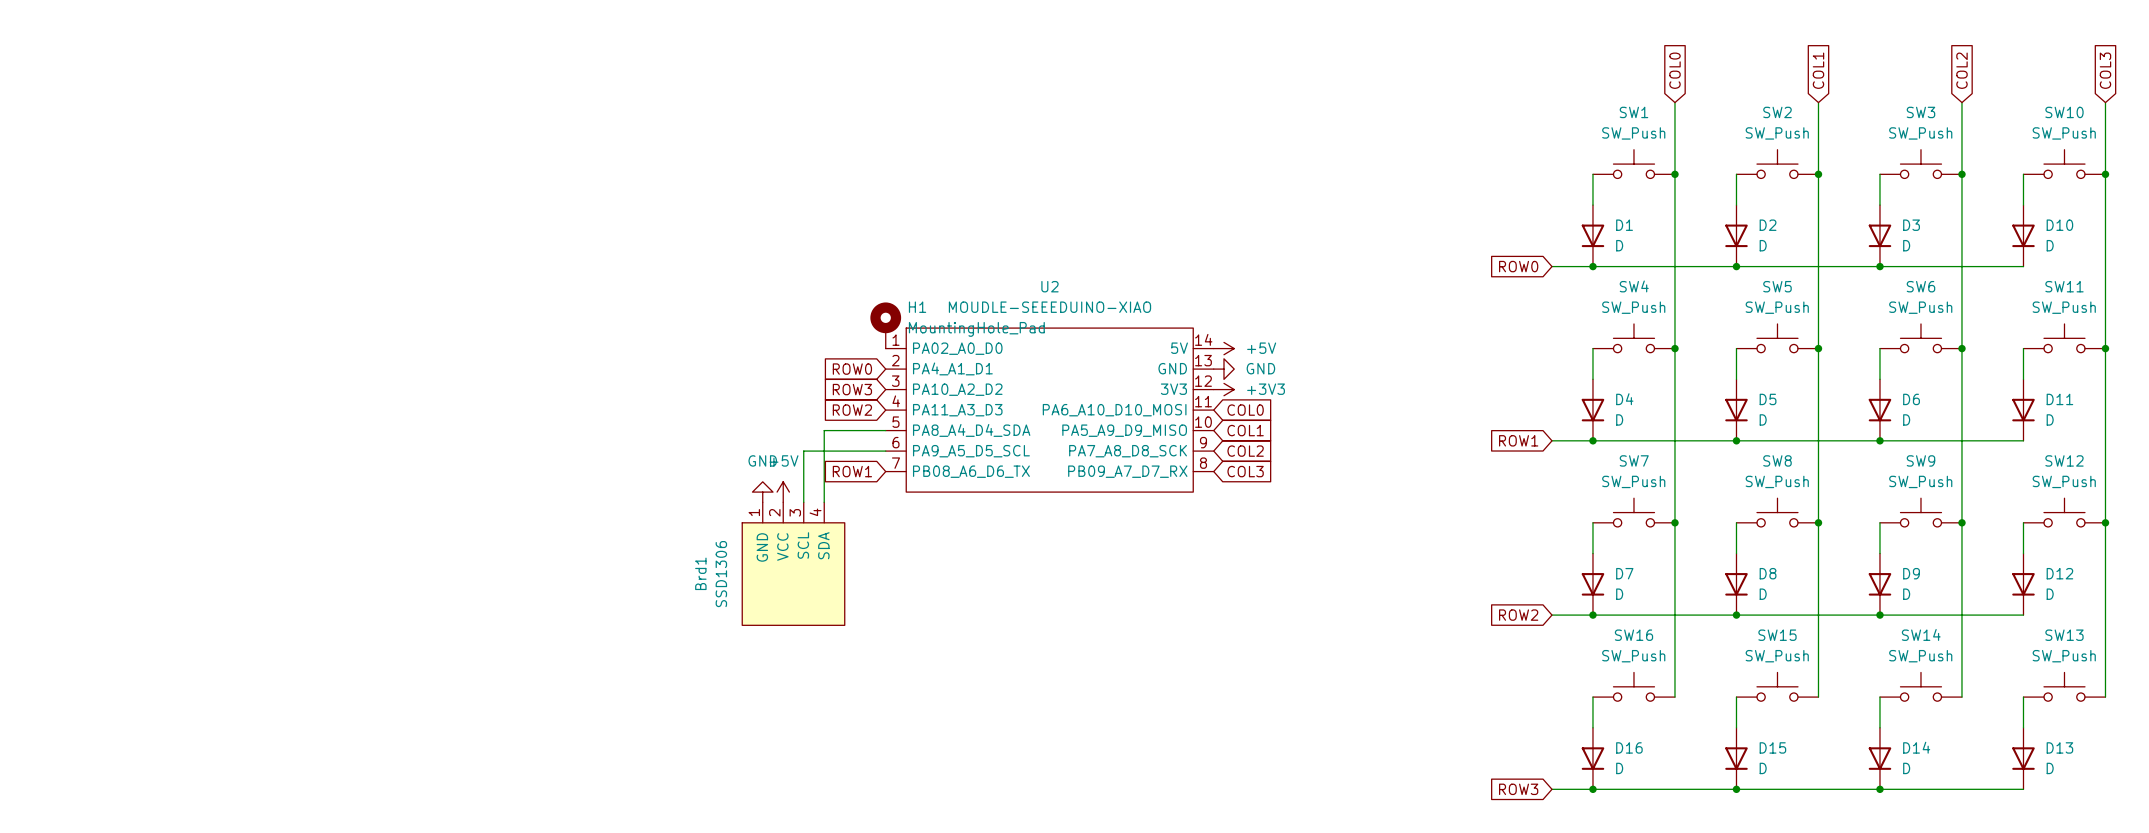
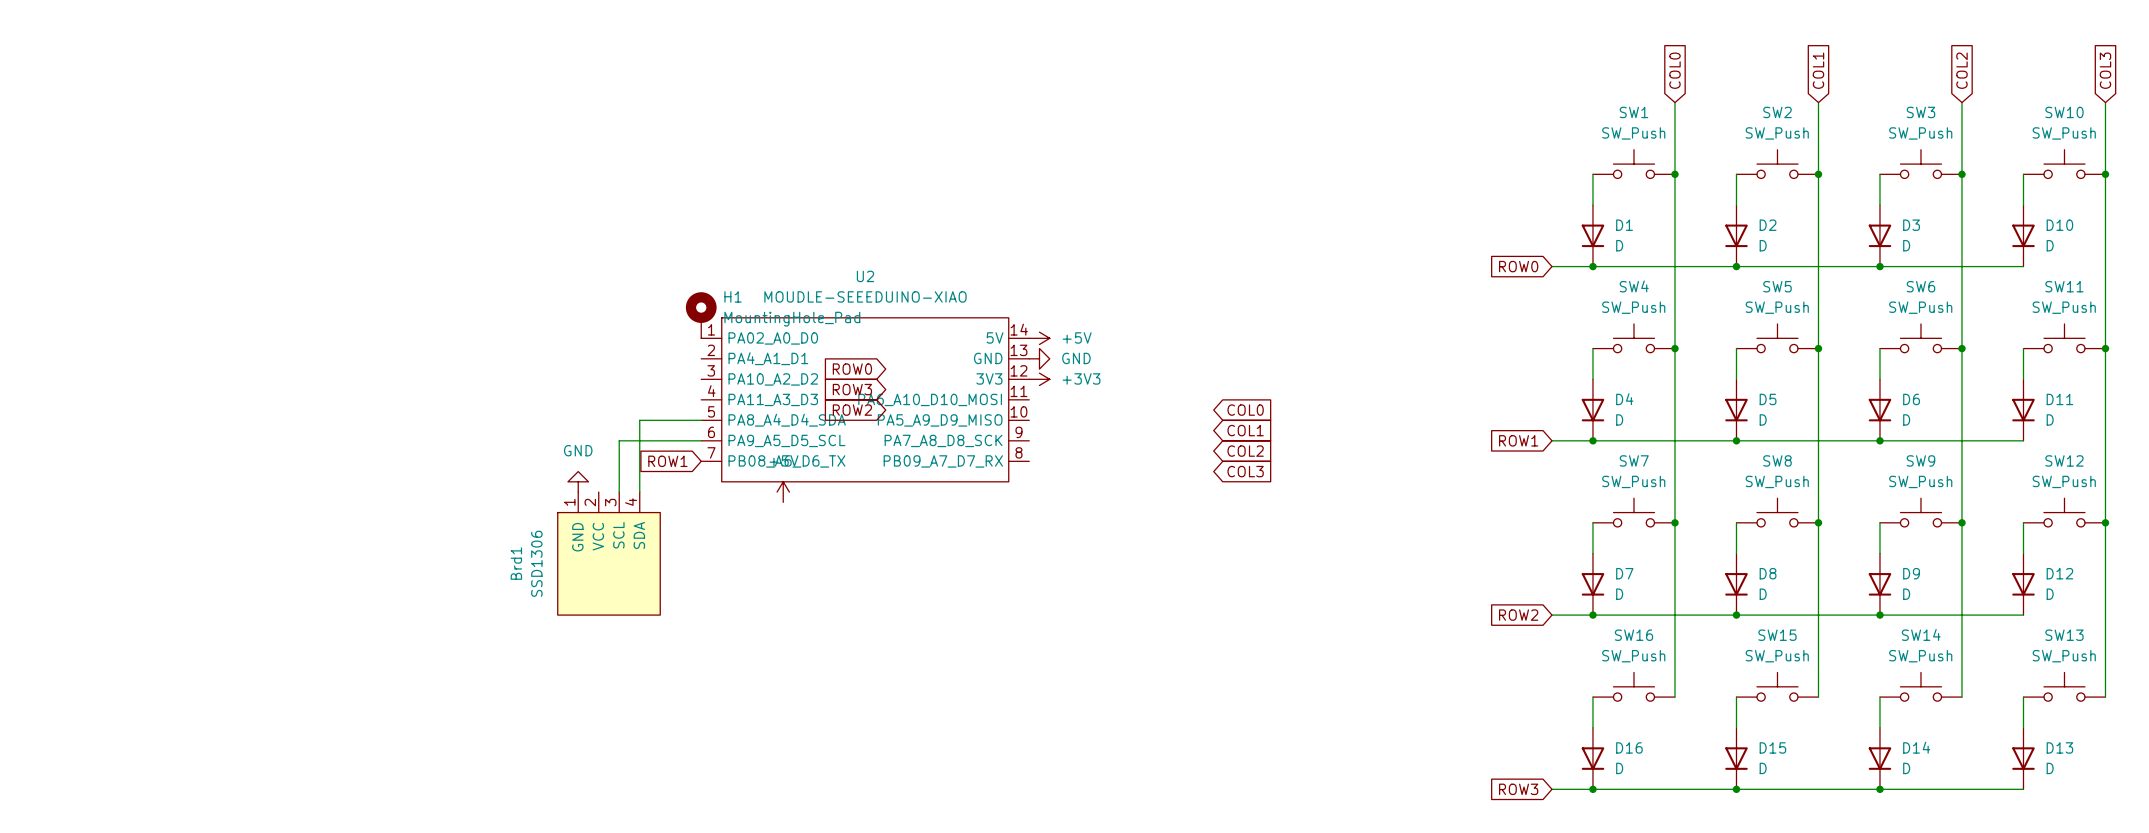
H1 position: (885, 325) -> (701, 315)
power symbol position: +5V (1223, 348) -> +5V (1039, 338)
power symbol: none -> GND (1039, 358)
power symbol: GND (1223, 369) -> none
power symbol position: +3V3 (1223, 389) -> +3V3 (1039, 379)
U2 position: (1049, 410) -> (865, 399)
wire: (885, 430) (824, 430) (824, 502) -> (701, 420) (639, 420) (639, 492)
wire: (885, 451) (803, 451) (803, 502) -> (701, 440) (619, 440) (619, 492)
global label position: ROW1 (852, 471) -> ROW1 (667, 461)
power symbol: none -> GND (578, 481)
power symbol: GND (762, 492) -> none
Brd1 position: (793, 563) -> (608, 553)

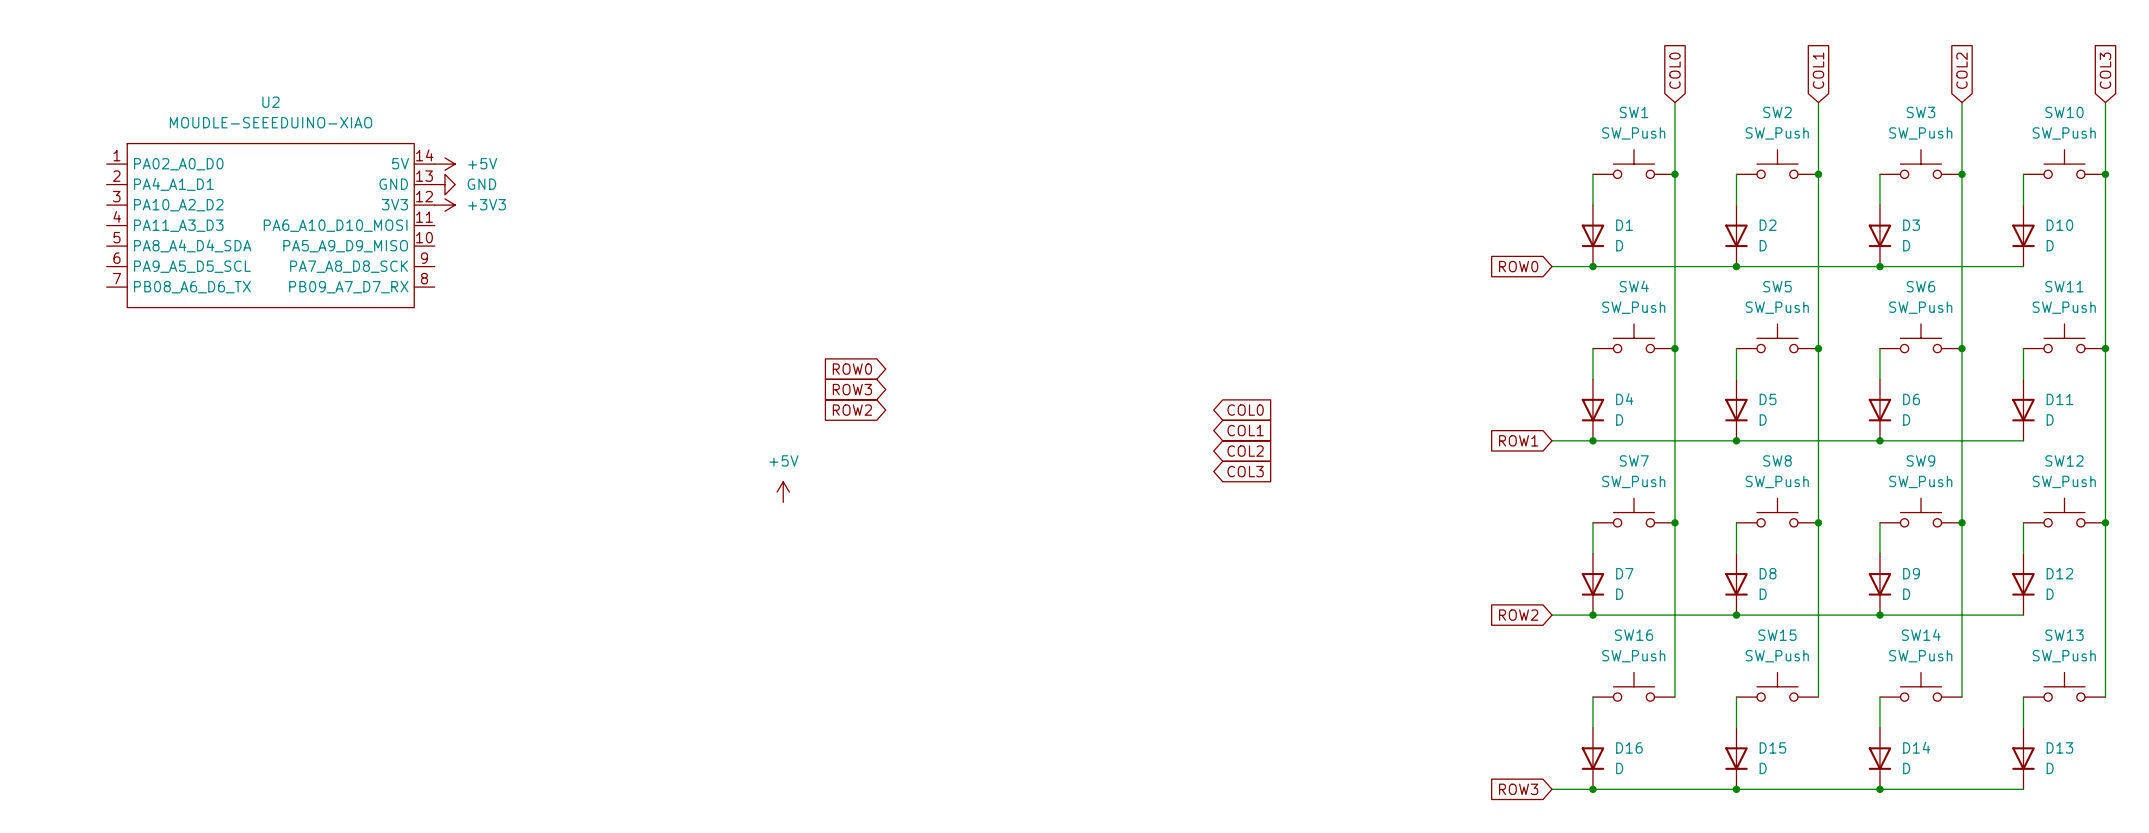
power symbol: none -> +5V (444, 164)
power symbol: none -> GND (444, 184)
power symbol: none -> +3V3 (444, 205)
H1: MountingHole_Pad (701, 315) -> none
power symbol: +5V (1039, 338) -> none
power symbol: GND (1039, 358) -> none
power symbol: +3V3 (1039, 379) -> none
U2 position: (865, 399) -> (270, 225)
wire: (701, 420) (639, 420) (639, 492) -> none
wire: (701, 440) (619, 440) (619, 492) -> none
global label: ROW1 (667, 461) -> none
power symbol: GND (578, 481) -> none
Brd1: SSD1306 (608, 553) -> none

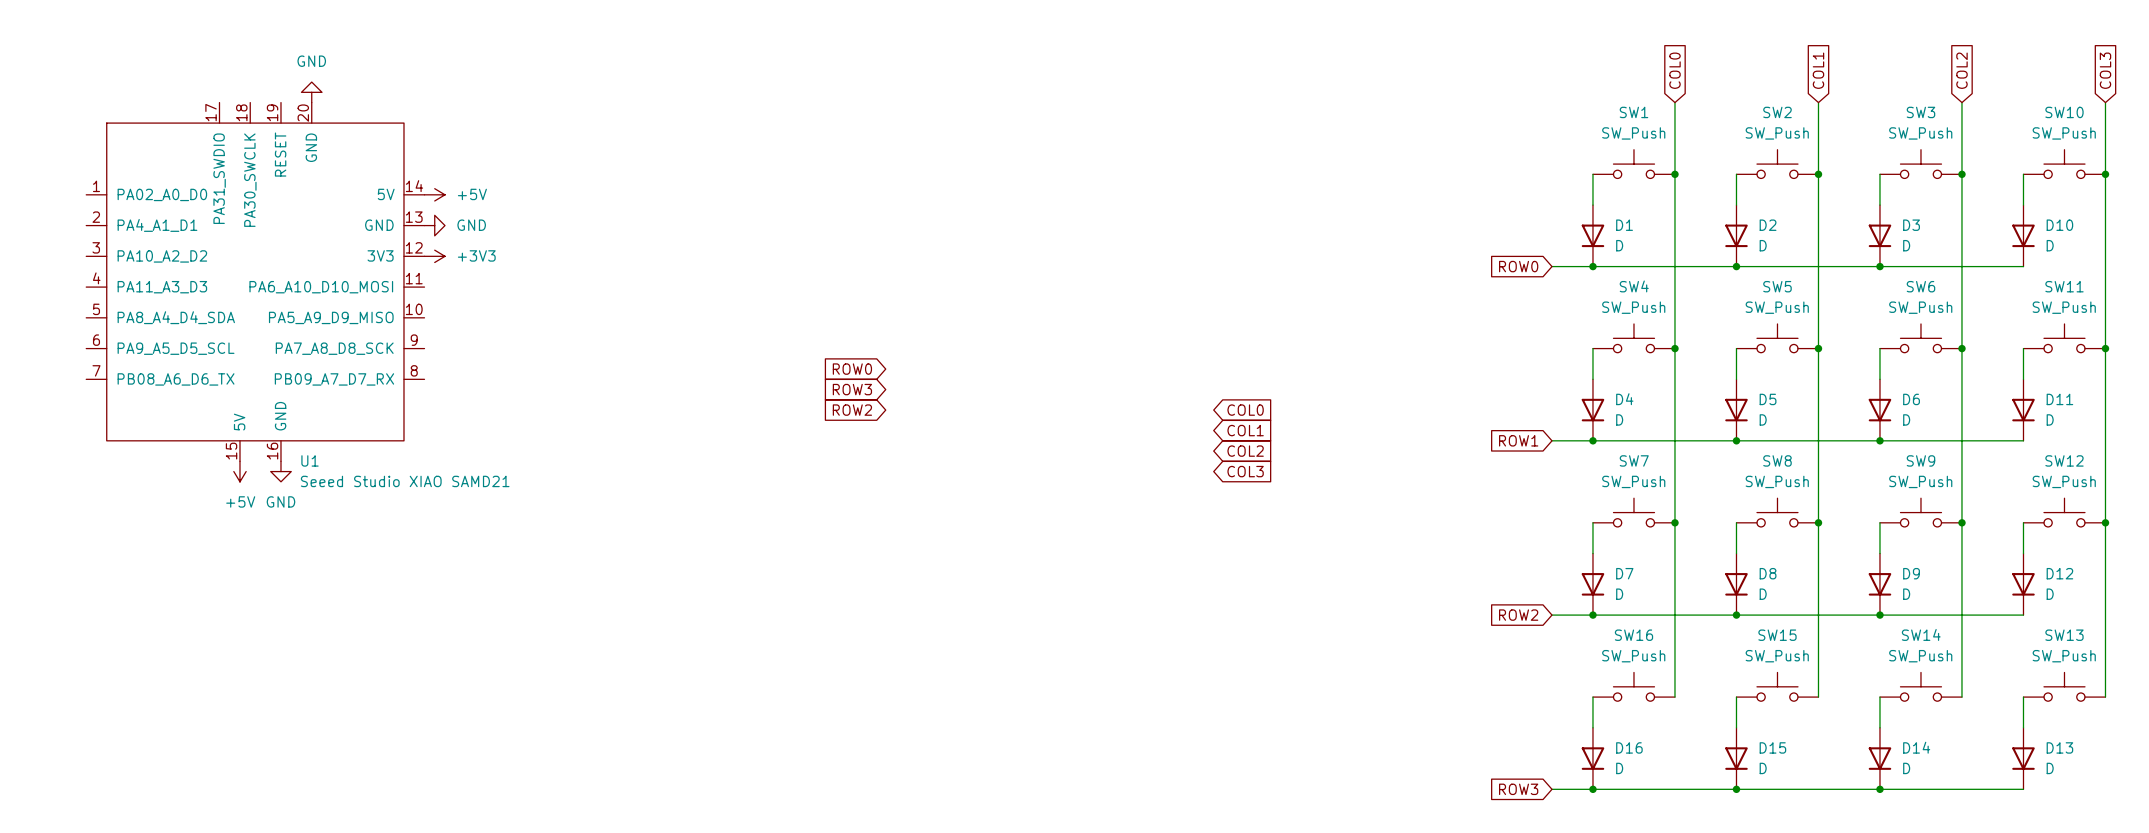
power symbol: none -> GND (311, 92)
power symbol position: +5V (444, 164) -> +5V (434, 194)
power symbol position: GND (444, 184) -> GND (434, 225)
power symbol position: +3V3 (444, 205) -> +3V3 (434, 256)
U2: MOUDLE-SEEEDUINO-XIAO (270, 225) -> none
U1: none -> Seeed Studio XIAO SAMD21 (255, 281)
power symbol: none -> +5V (239, 471)
power symbol: none -> GND (280, 471)
power symbol: +5V (783, 492) -> none

